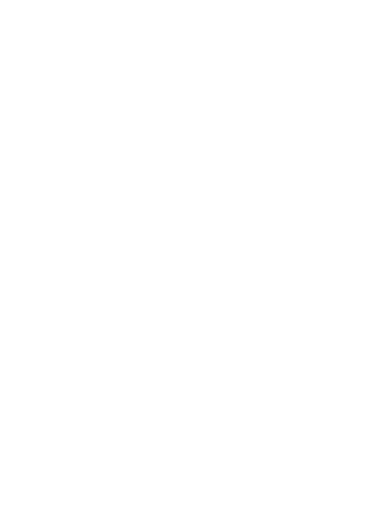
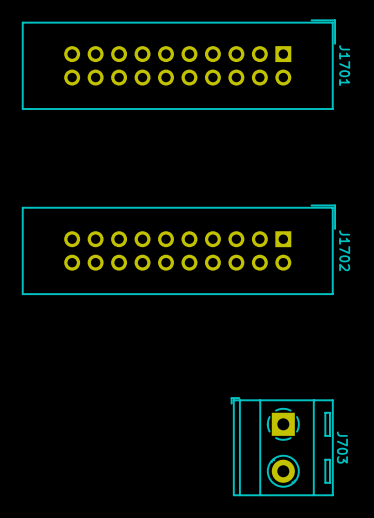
J1701: none -> (178, 64)
J1702: none -> (178, 249)
J703: none -> (282, 446)

